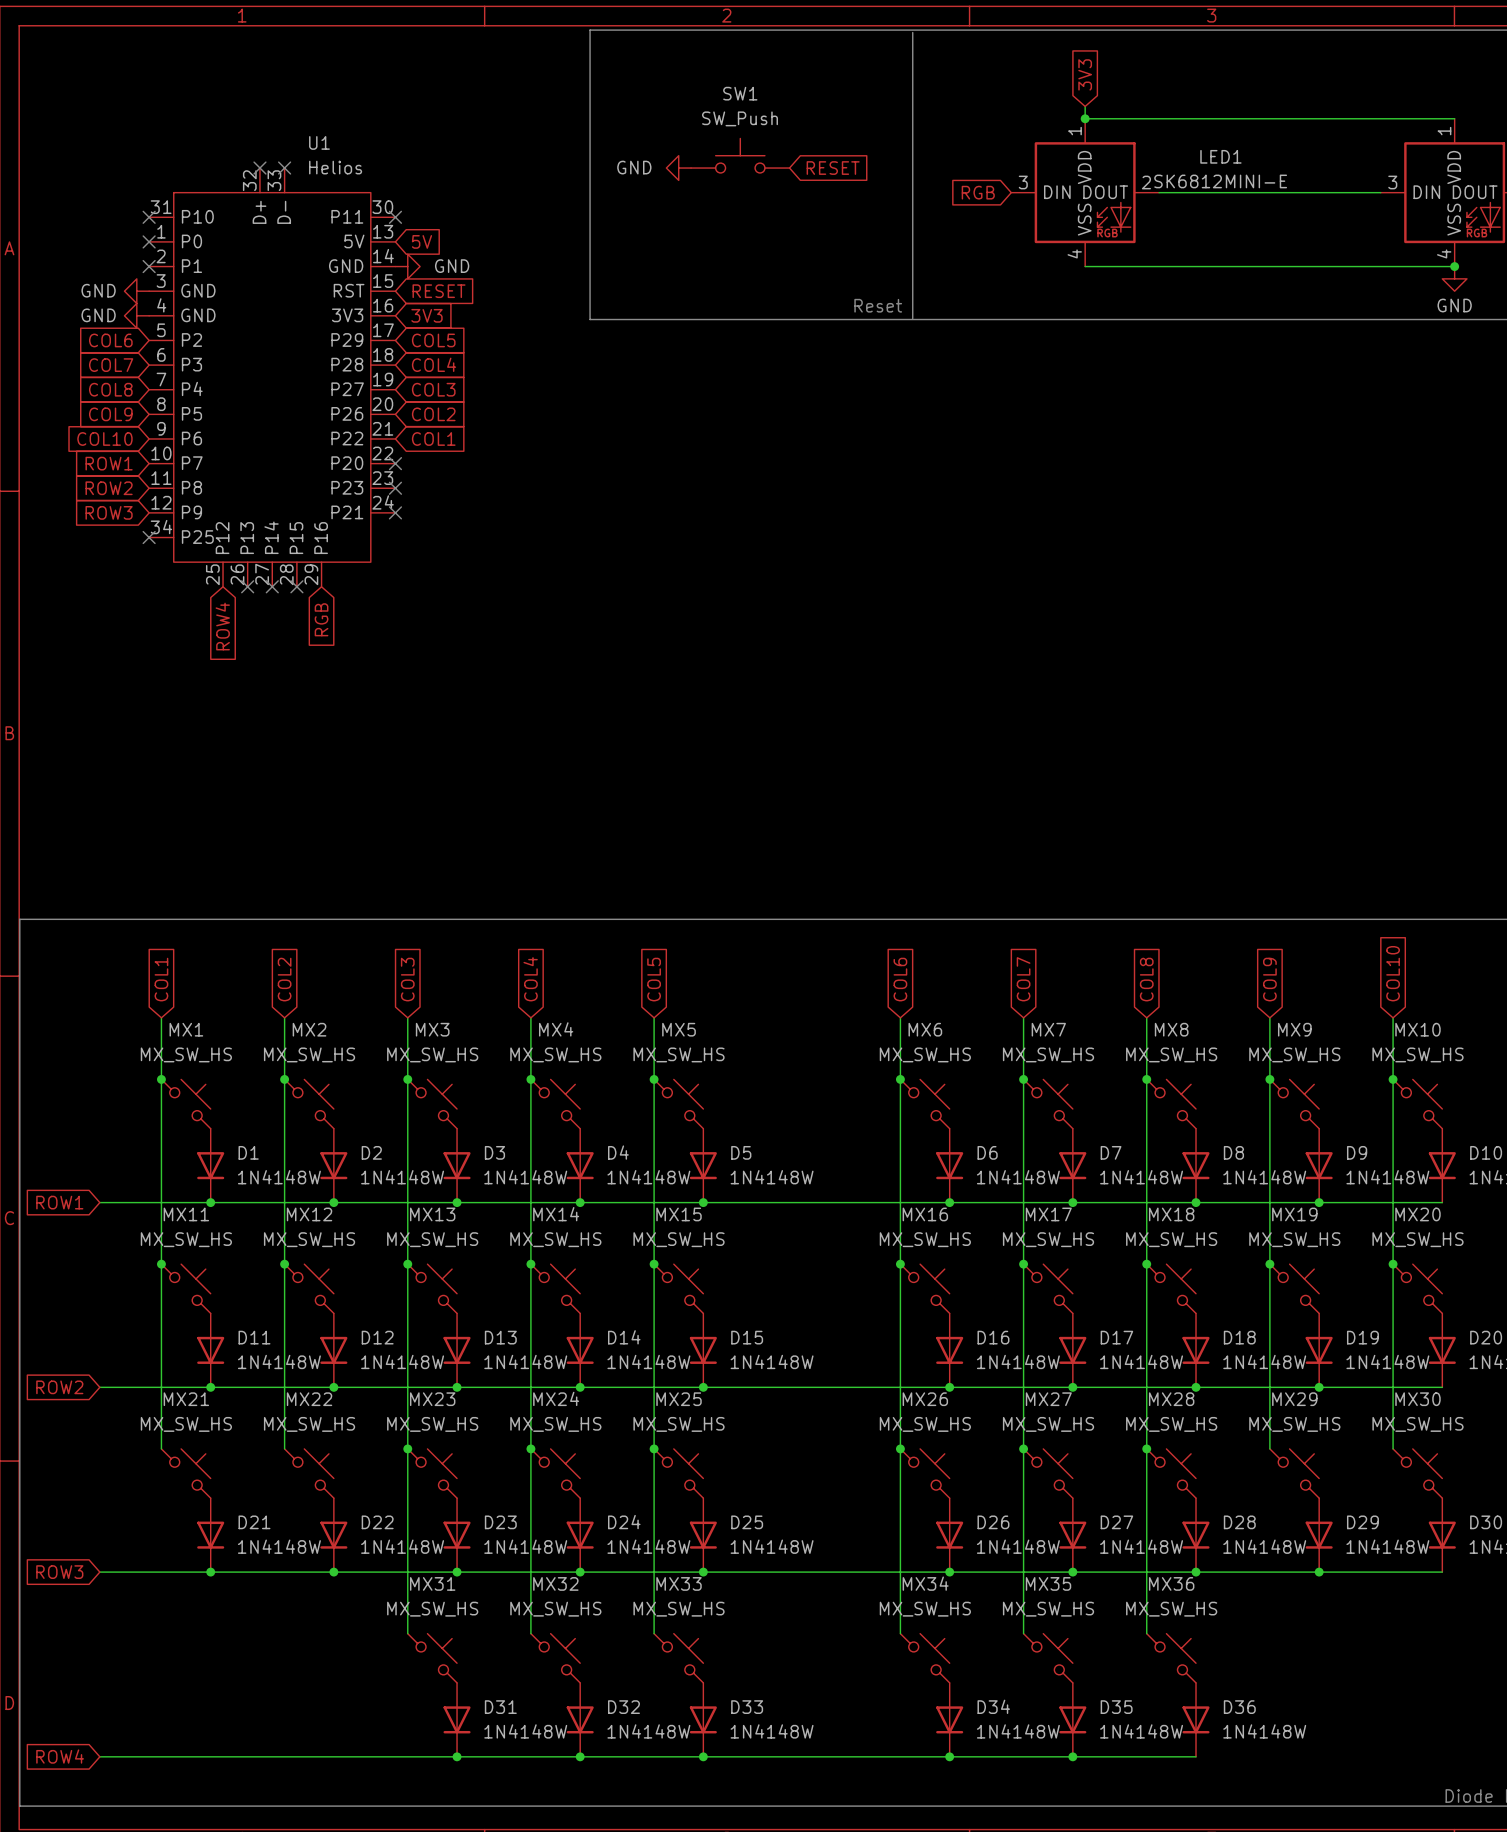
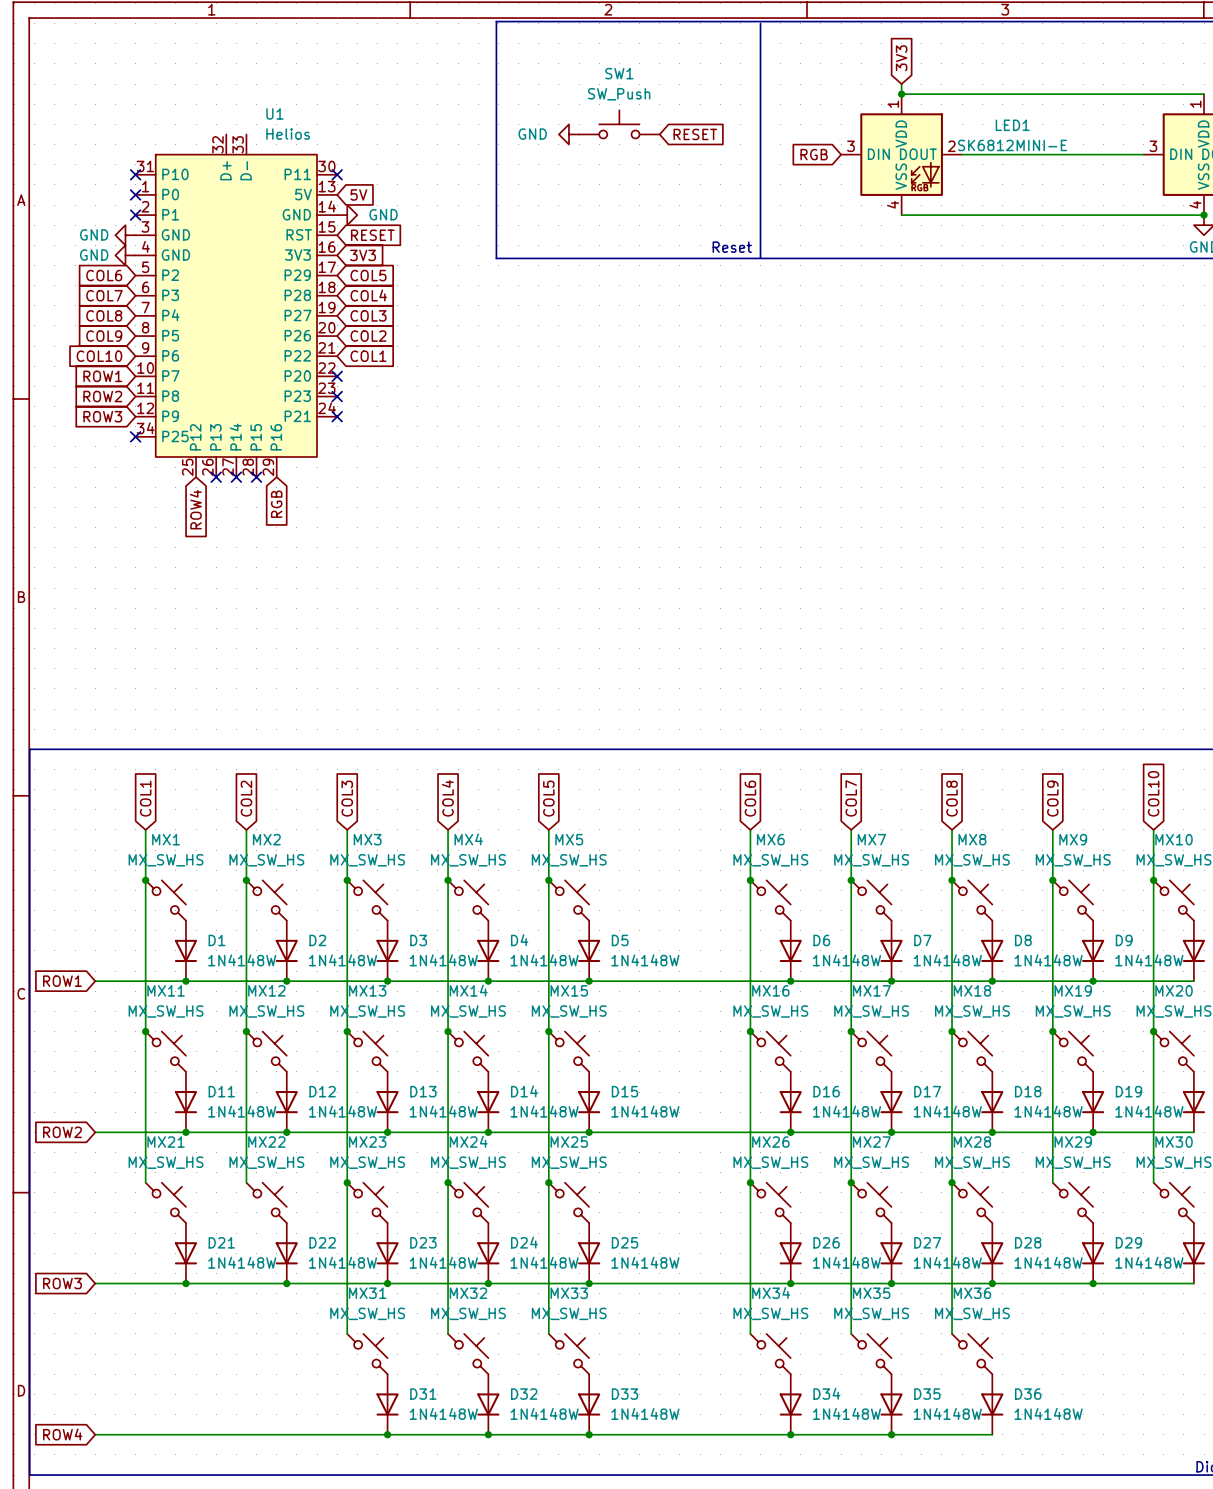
no-connect mark: (259, 168) -> none
no-connect mark: (284, 168) -> none

